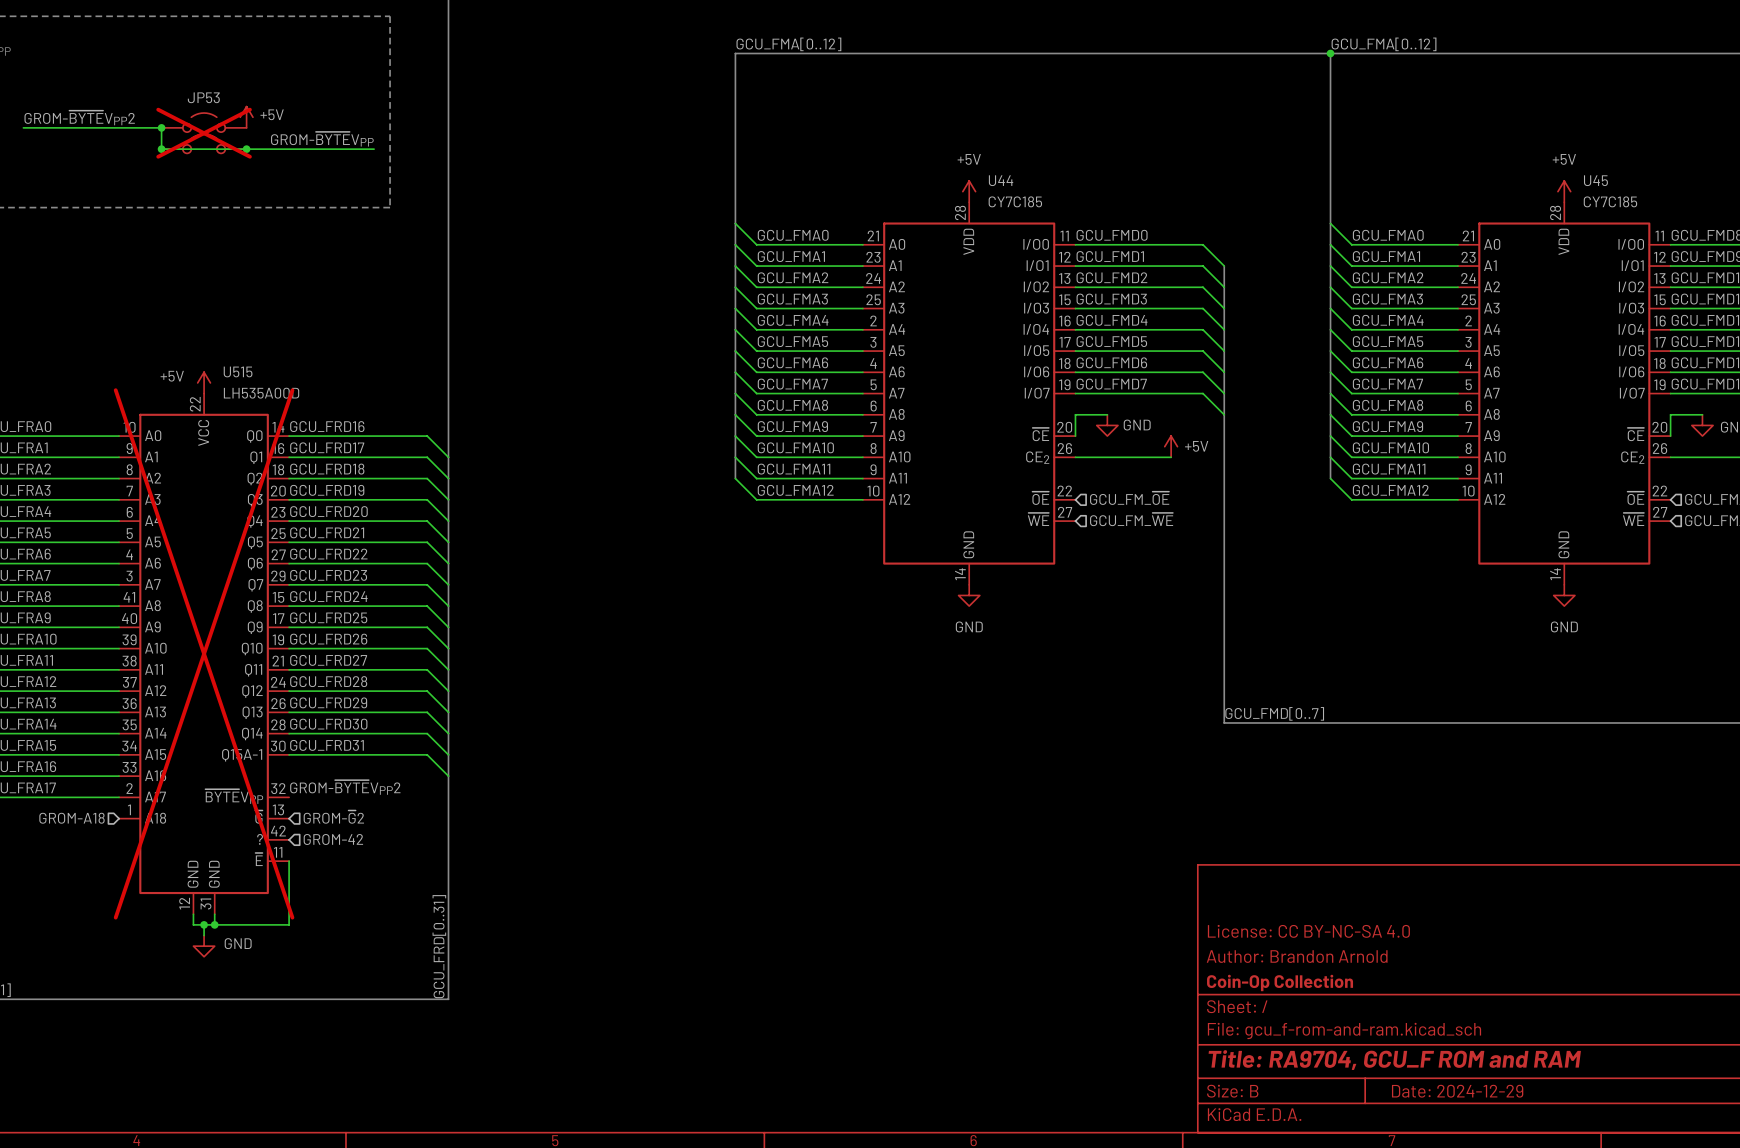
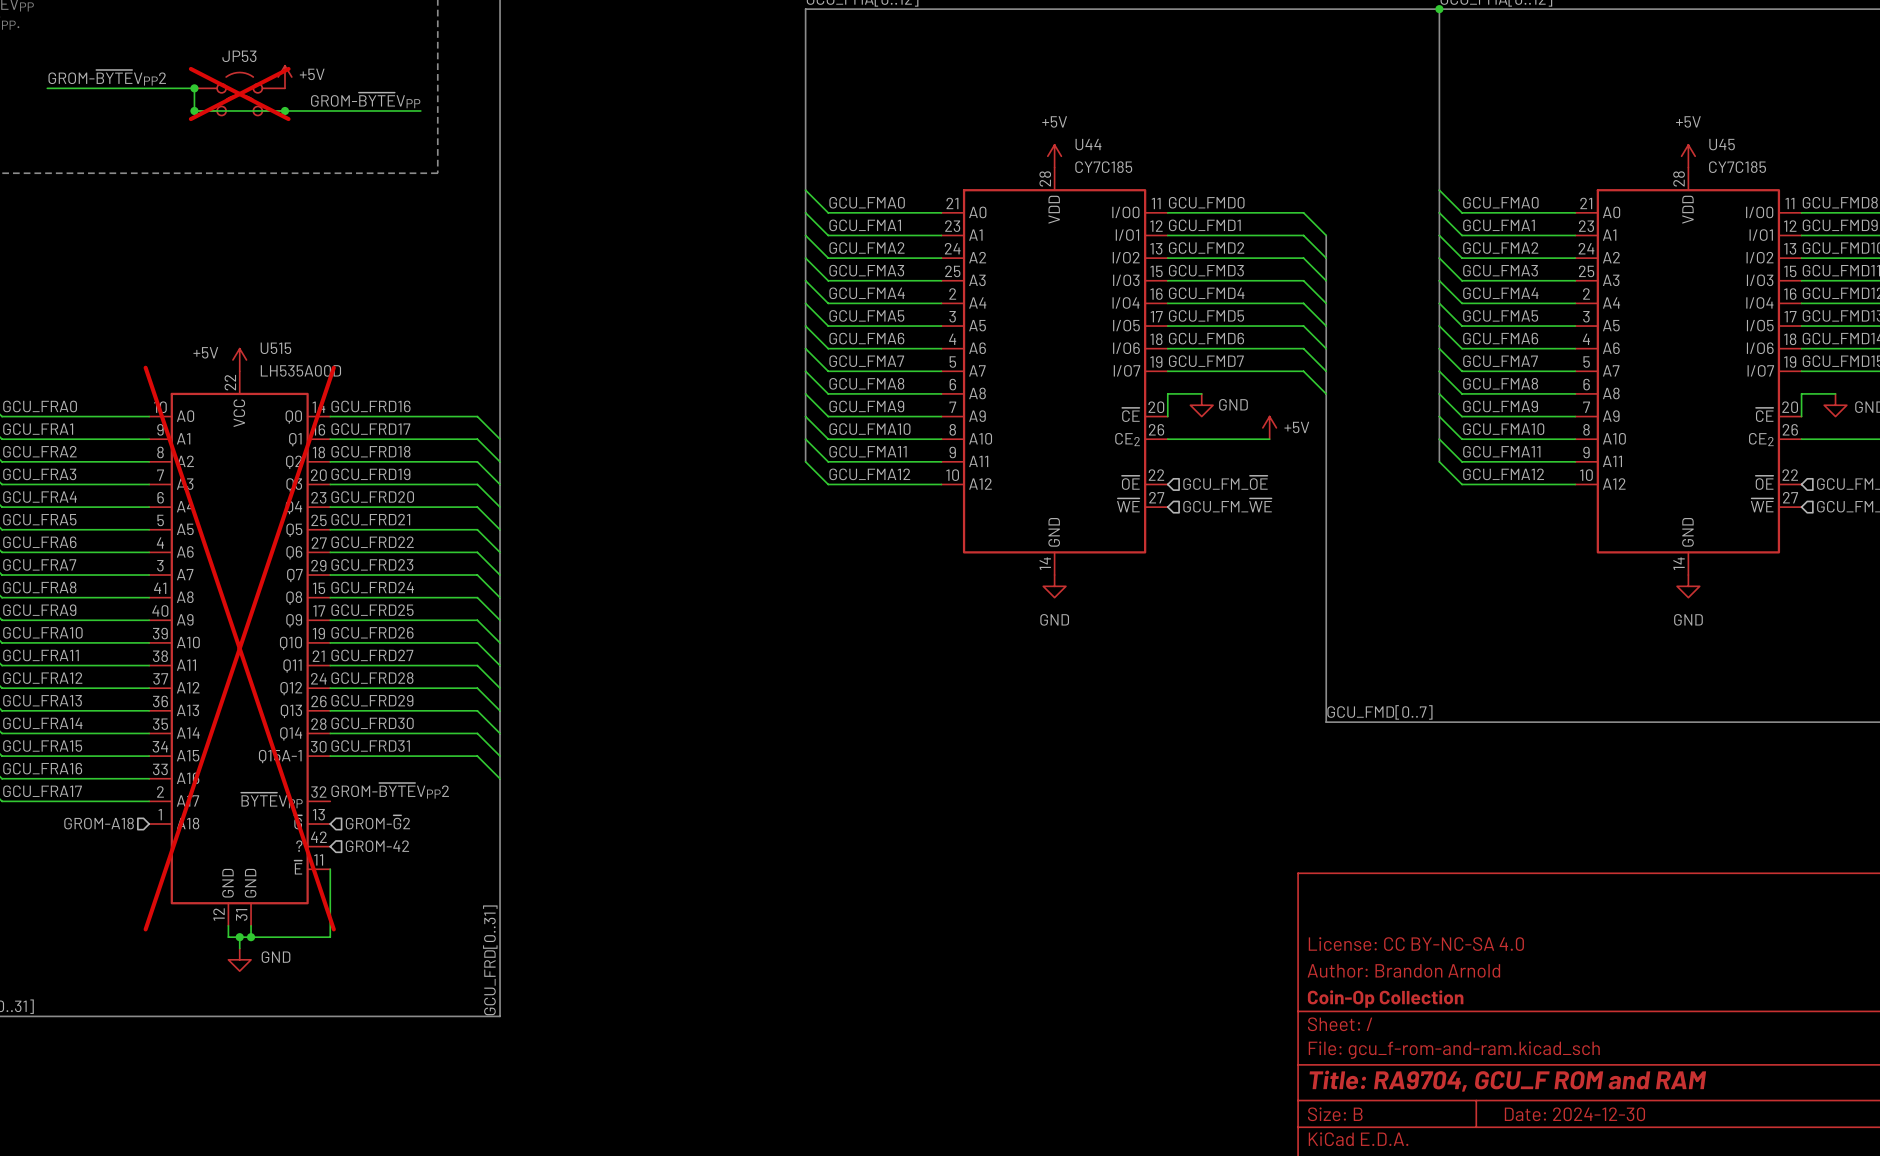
title block: Date: 2024-12-29 (1457, 1091) -> Date: 2024-12-30 (1574, 1114)

